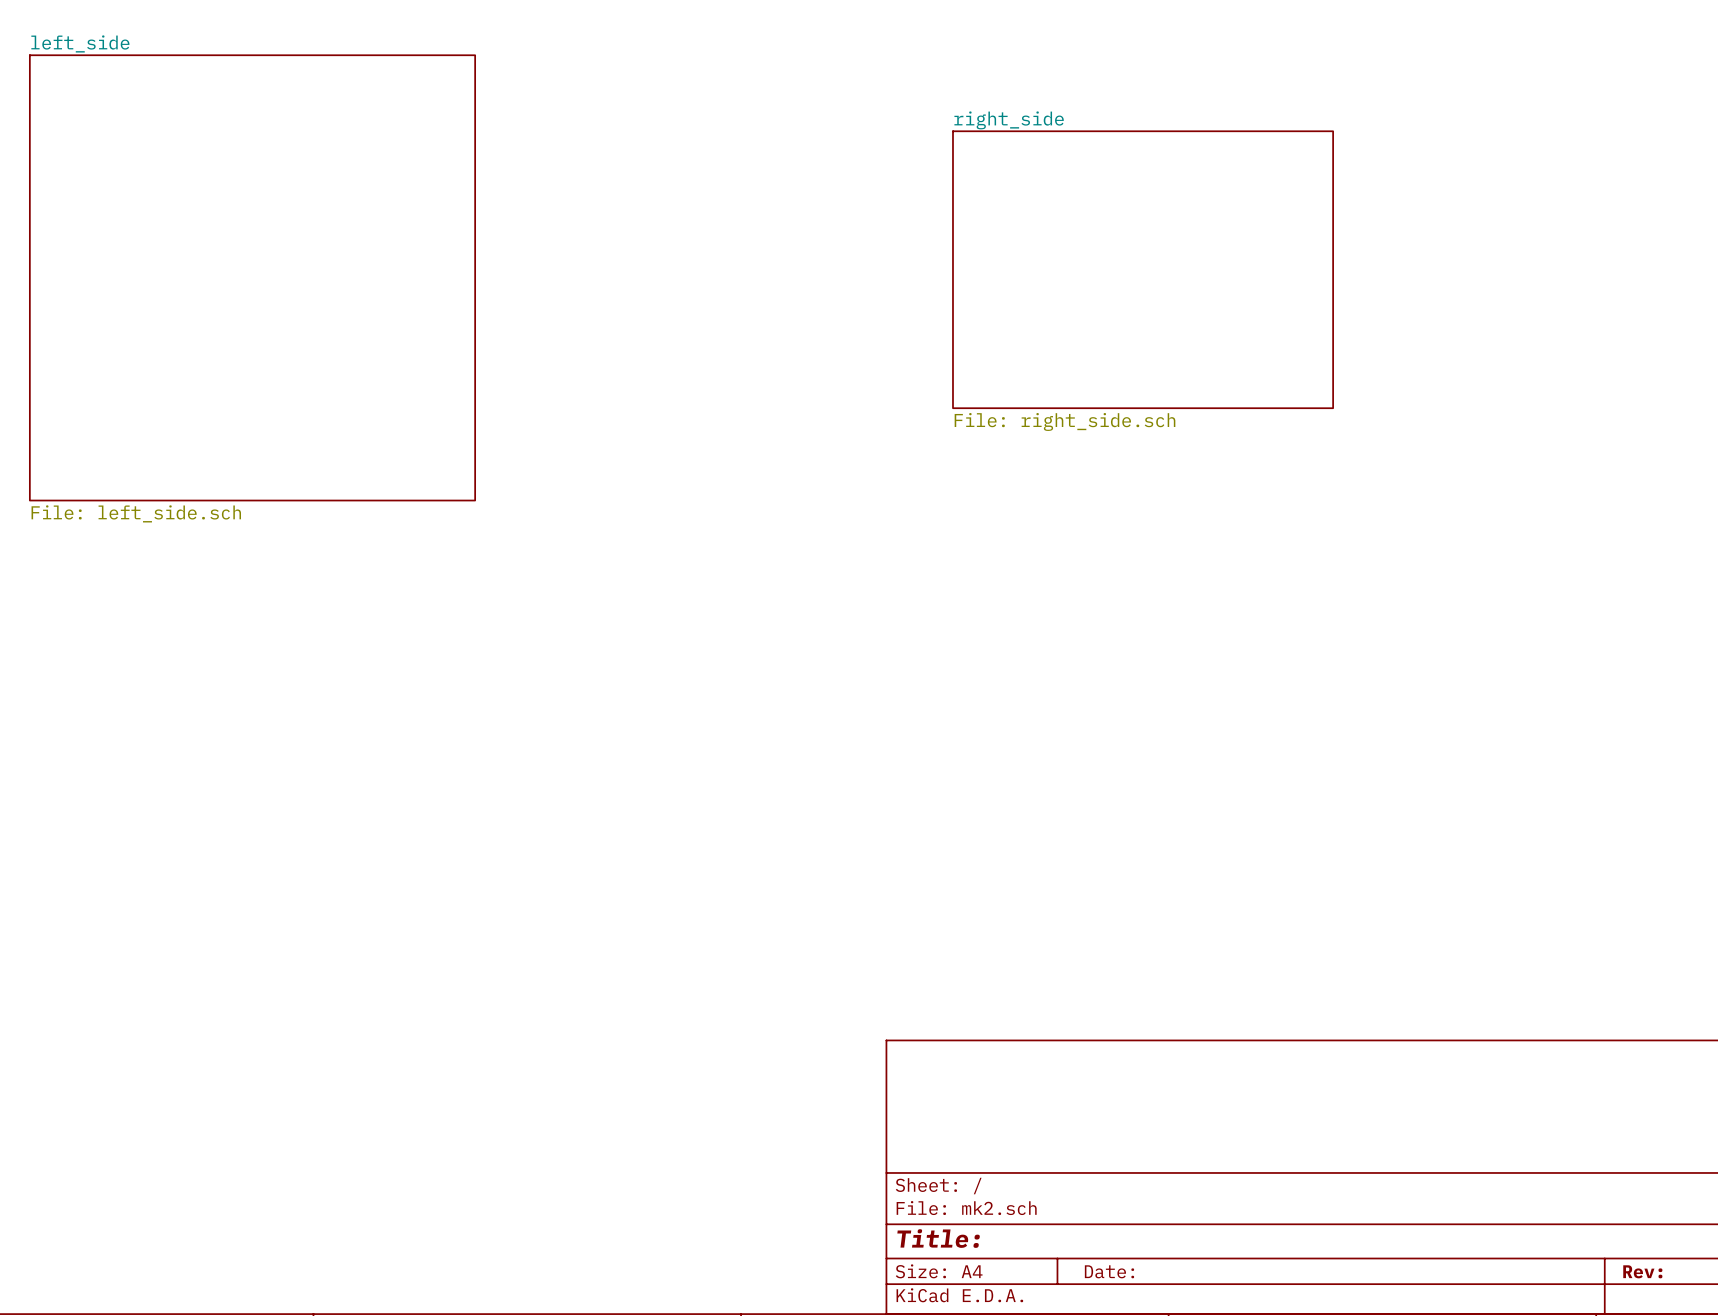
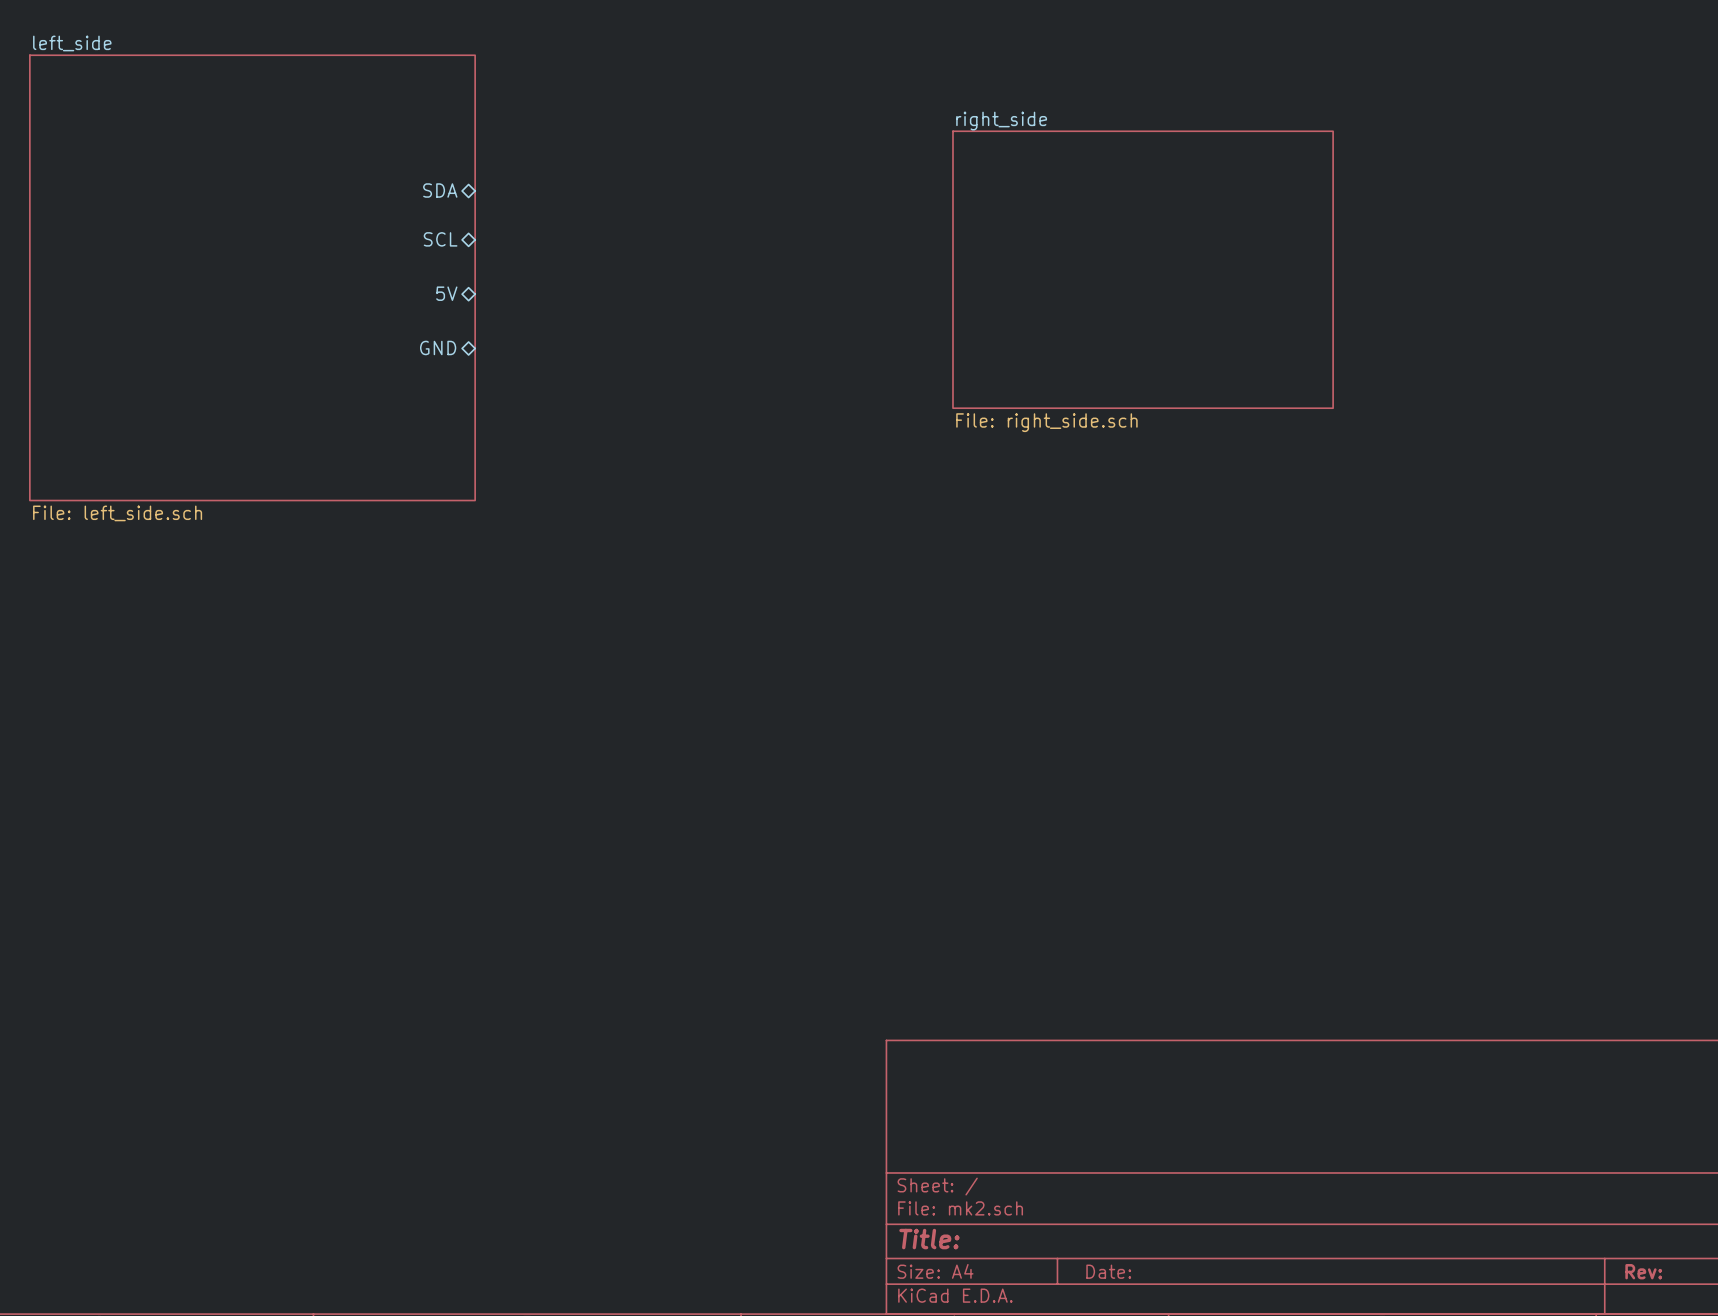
sheet pin: none -> SDA (440, 190)
sheet pin: none -> SCL (440, 239)
sheet pin: none -> 5V (446, 293)
sheet pin: none -> GND (438, 347)

